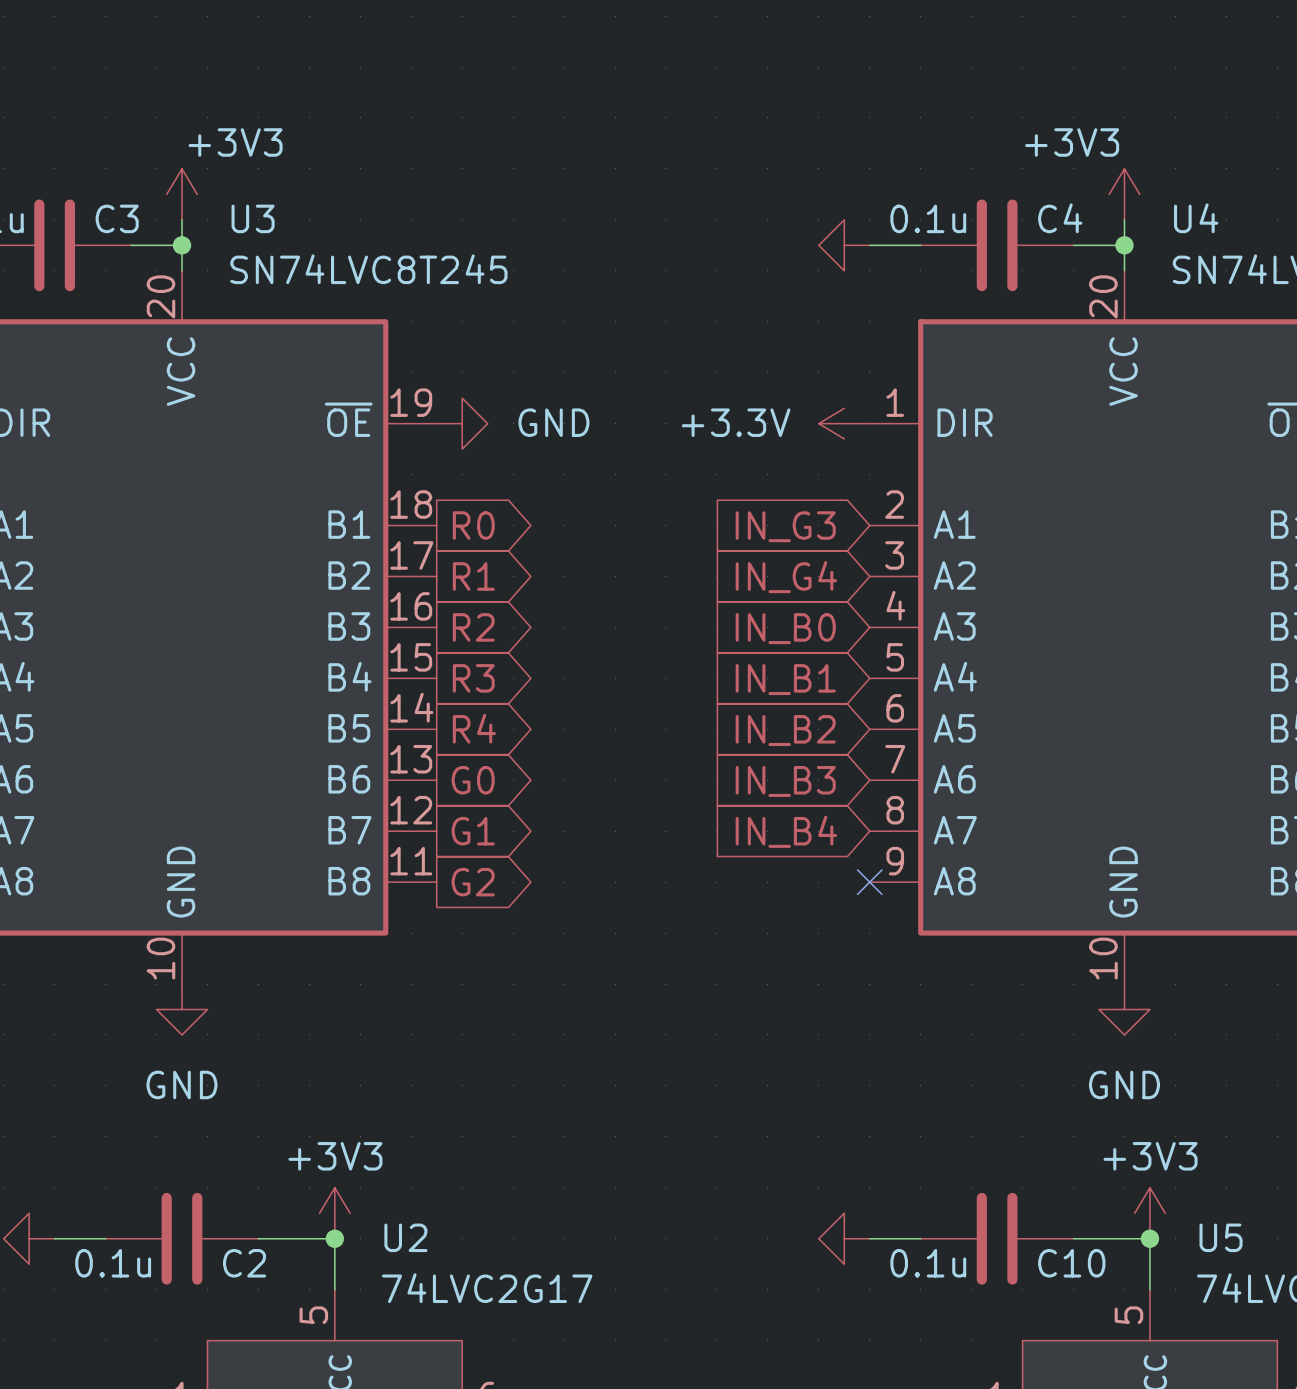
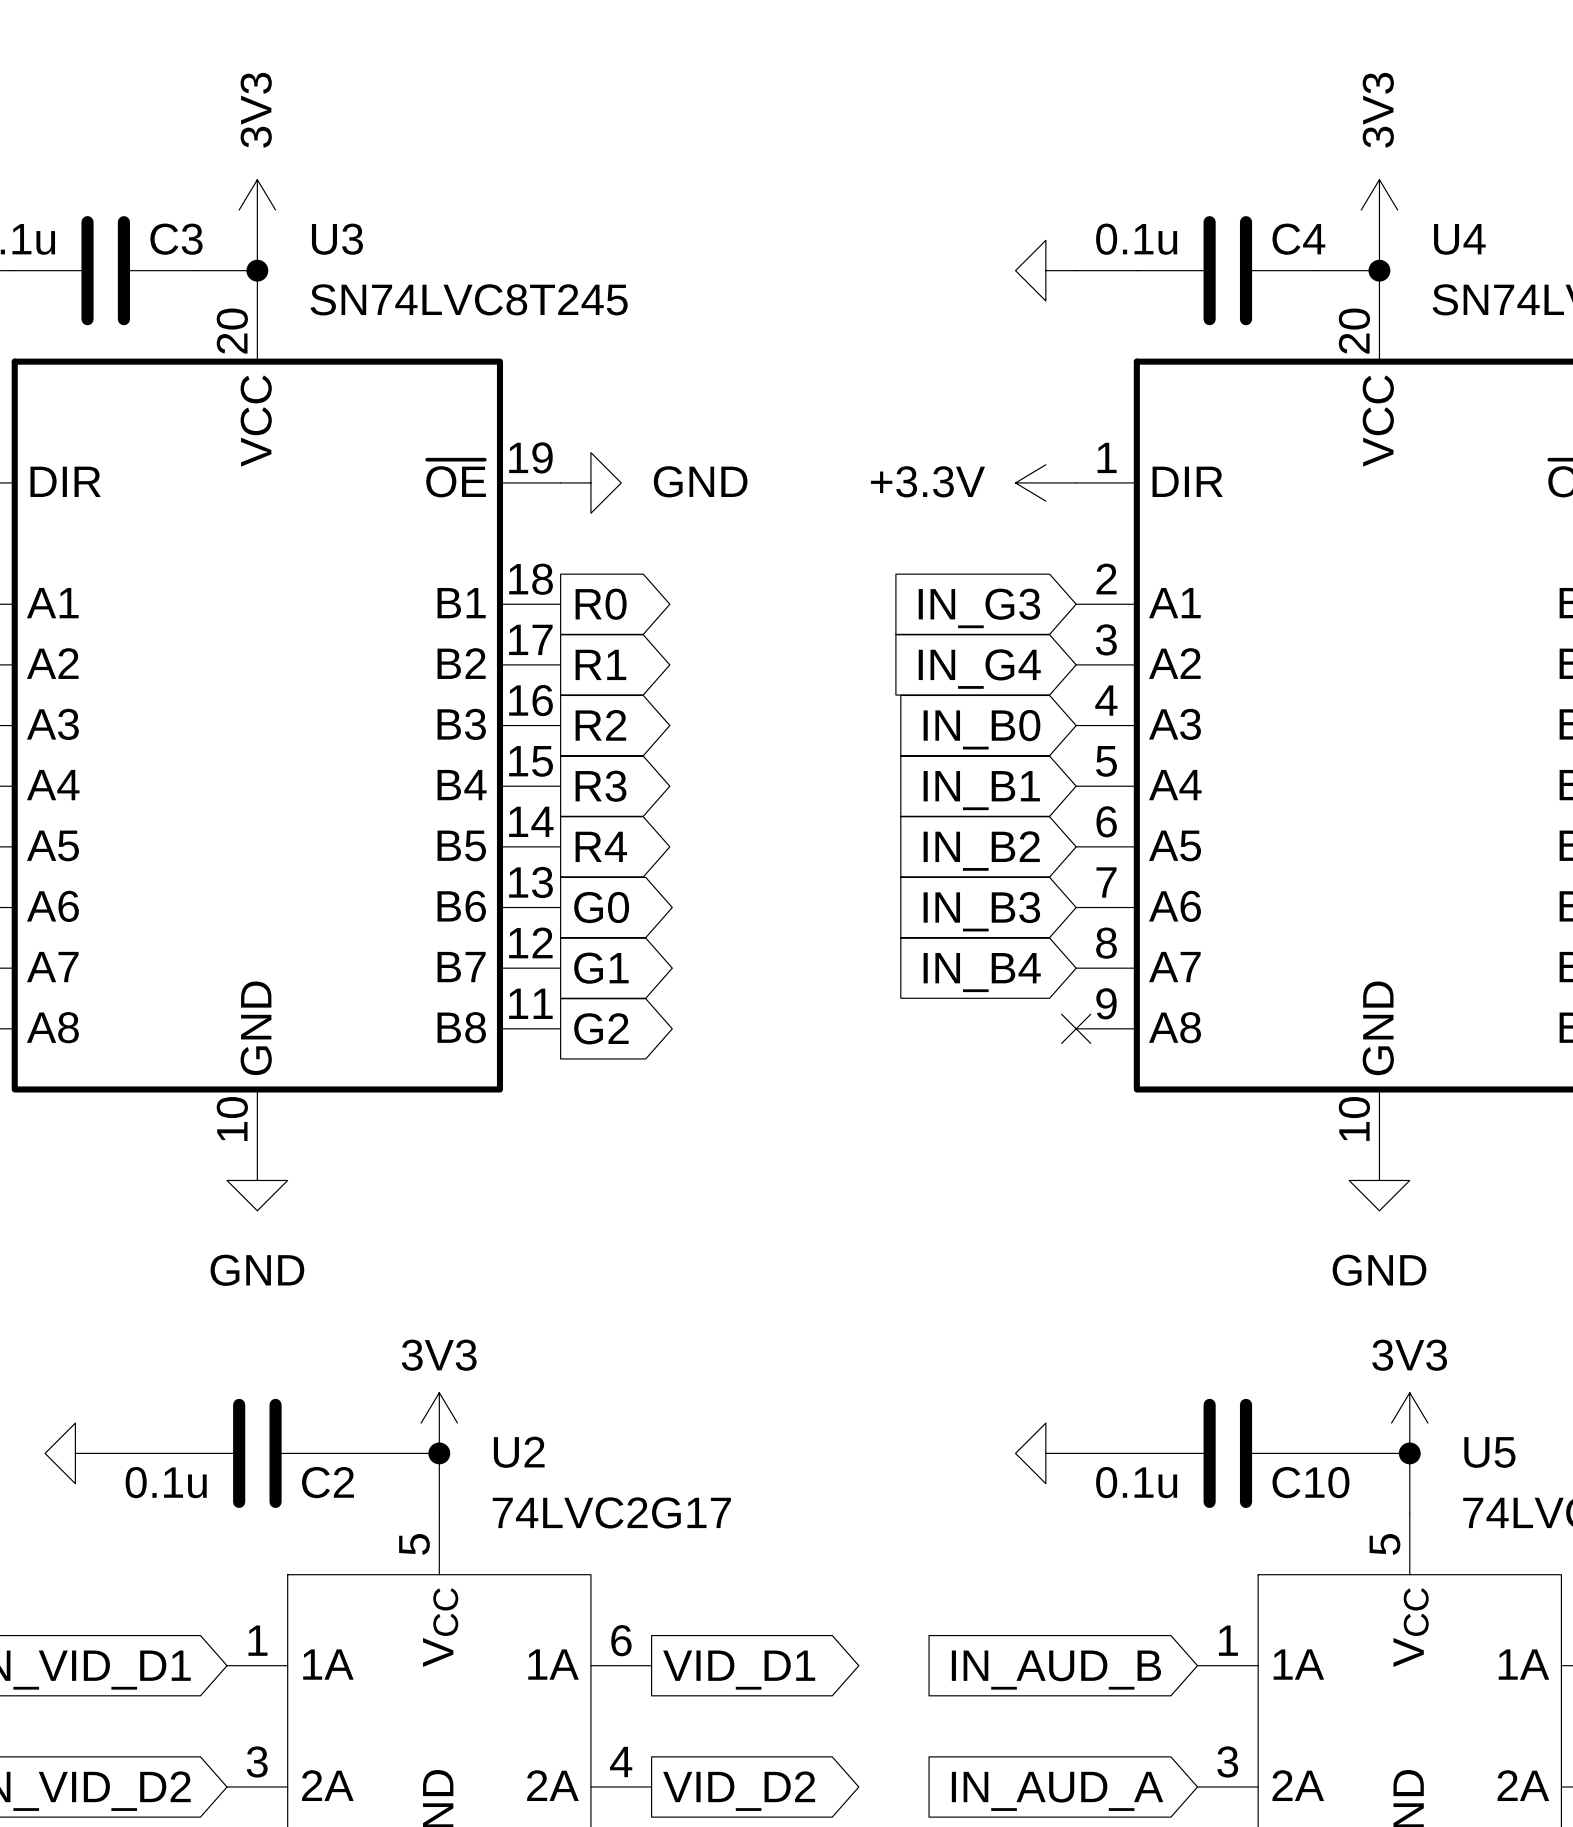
power symbol: +3V3 (182, 194) -> 3V3 (257, 210)
power symbol: +3V3 (1124, 194) -> 3V3 (1379, 210)
power symbol: +3V3 (334, 1213) -> 3V3 (439, 1423)
power symbol: +3V3 (1149, 1213) -> 3V3 (1409, 1423)

